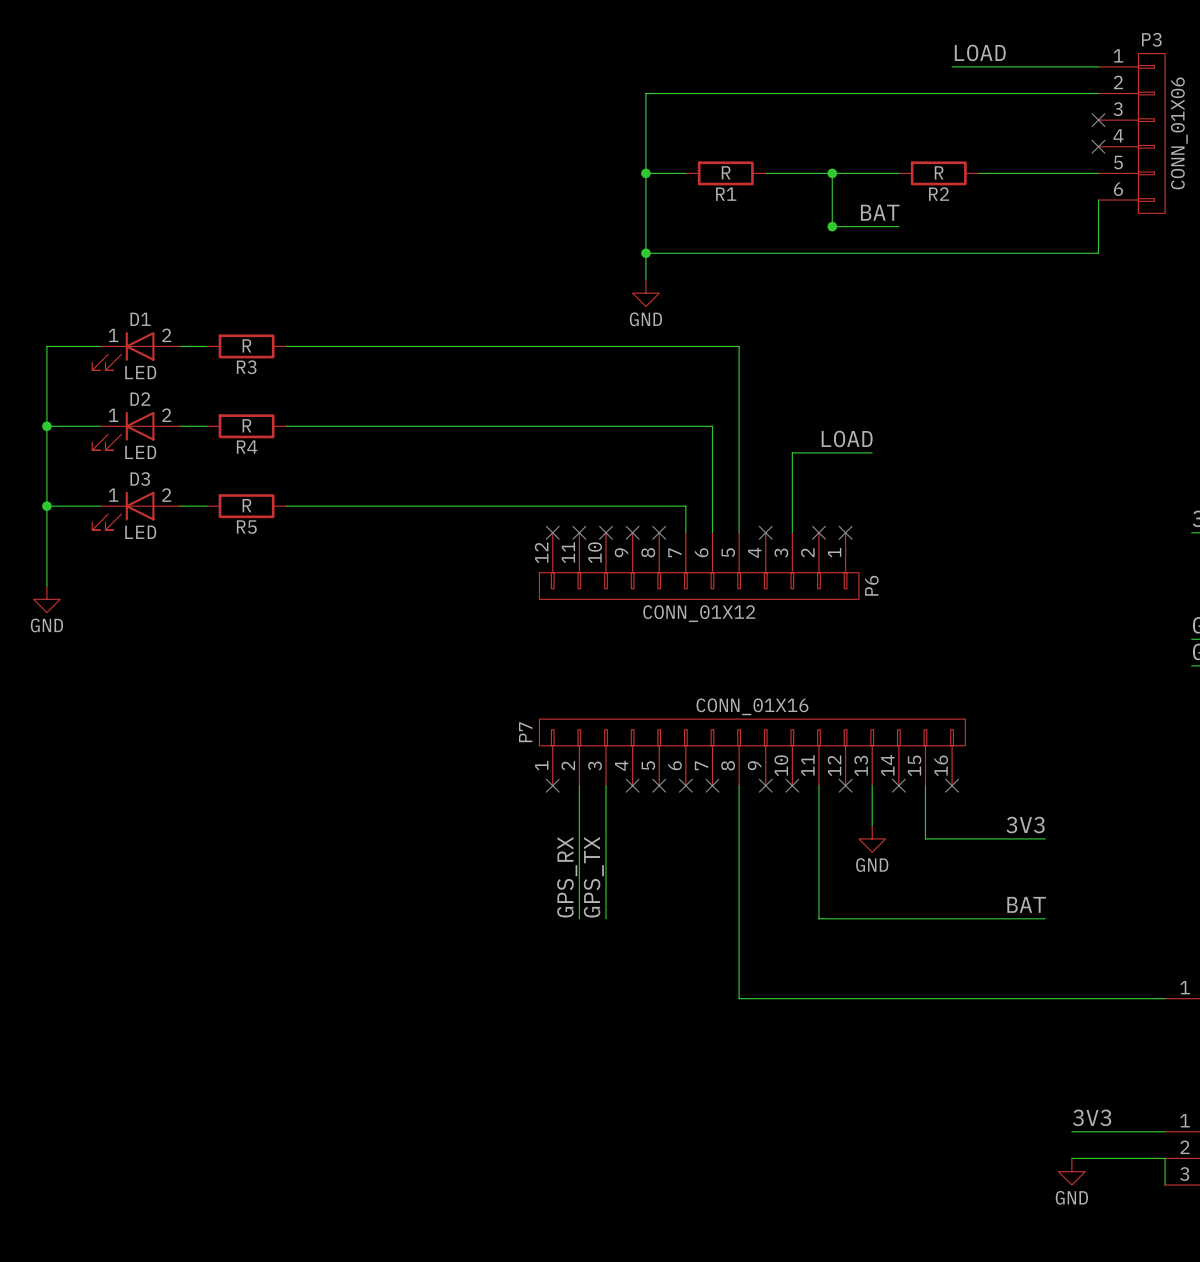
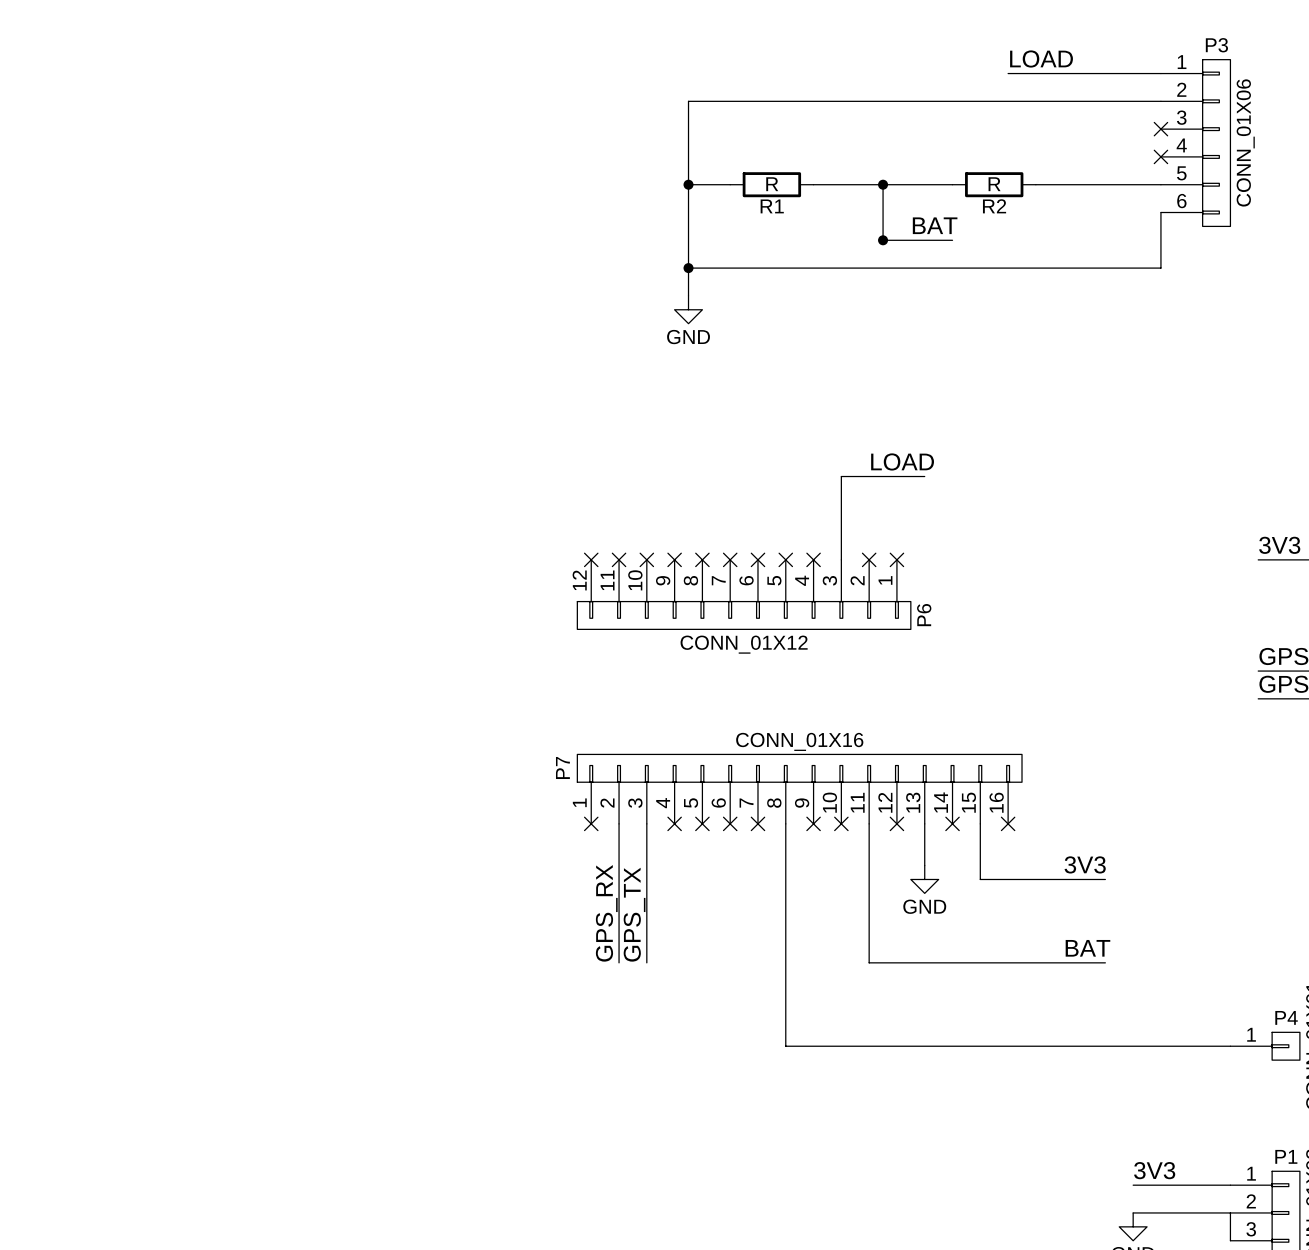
wire: (100, 346) (46, 346) (46, 586) -> none
wire: (180, 346) (206, 346) -> none
R3: R (246, 346) -> none
wire: (286, 346) (739, 346) (739, 532) -> none
D1: LED (136, 351) -> none
wire: (46, 426) (100, 426) -> none
junction: (46, 426) -> none
wire: (180, 426) (206, 426) -> none
R4: R (246, 426) -> none
wire: (286, 426) (712, 426) (712, 532) -> none
D2: LED (136, 431) -> none
wire: (46, 506) (100, 506) -> none
junction: (46, 506) -> none
wire: (180, 506) (206, 506) -> none
R5: R (246, 506) -> none
wire: (286, 506) (685, 506) (685, 532) -> none
D3: LED (136, 510) -> none
no-connect mark: none -> (730, 559)
no-connect mark: none -> (757, 559)
no-connect mark: none -> (785, 559)
power symbol: GND (46, 599) -> none

